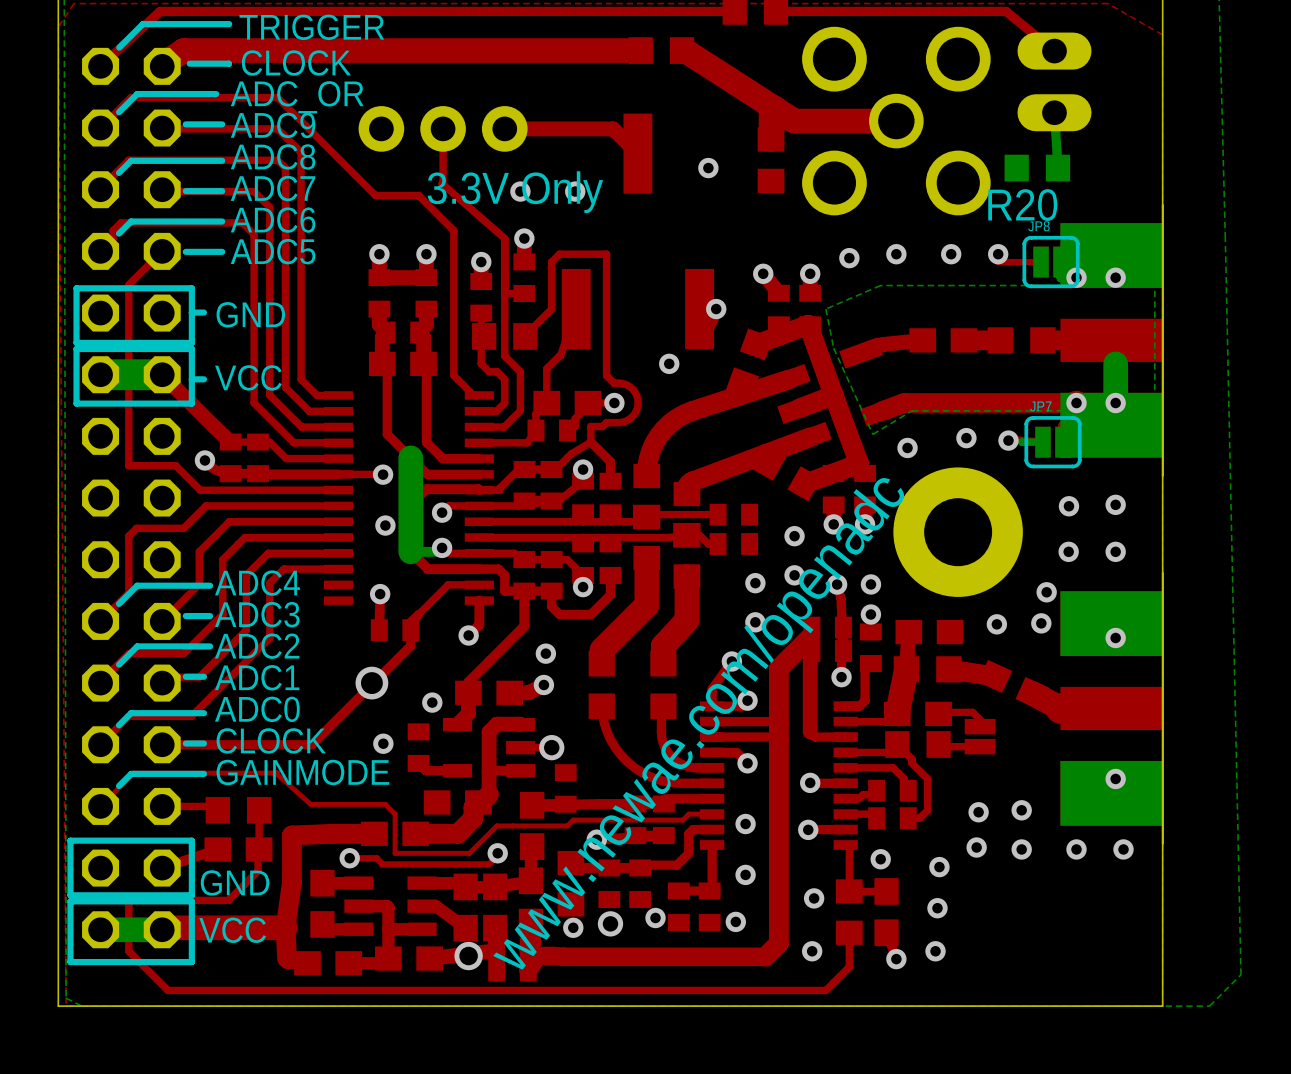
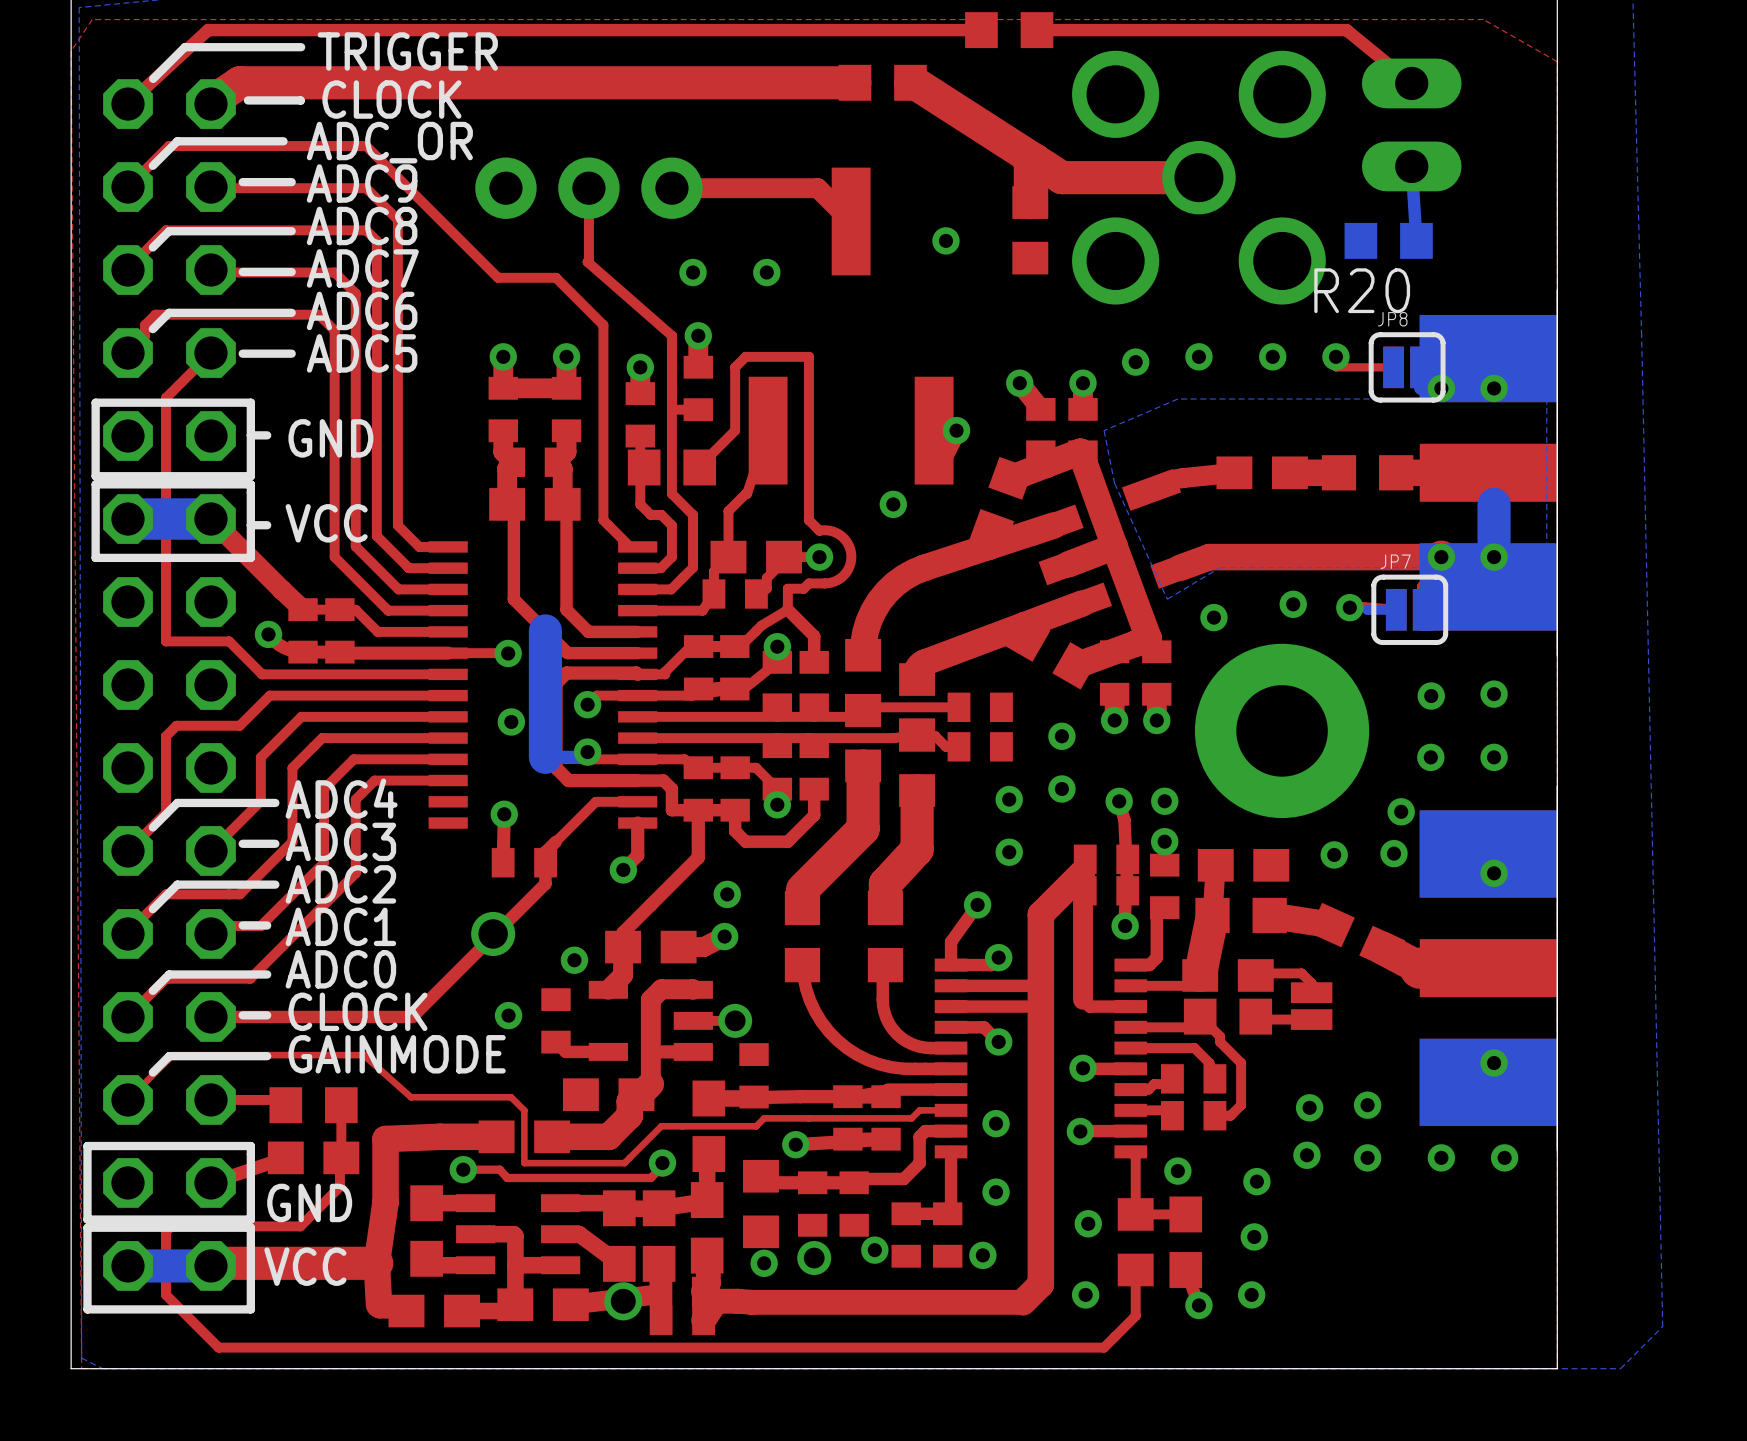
text: 3.3V Only (515, 192) -> none
text: www.newae.com/openadc (698, 723) -> none

